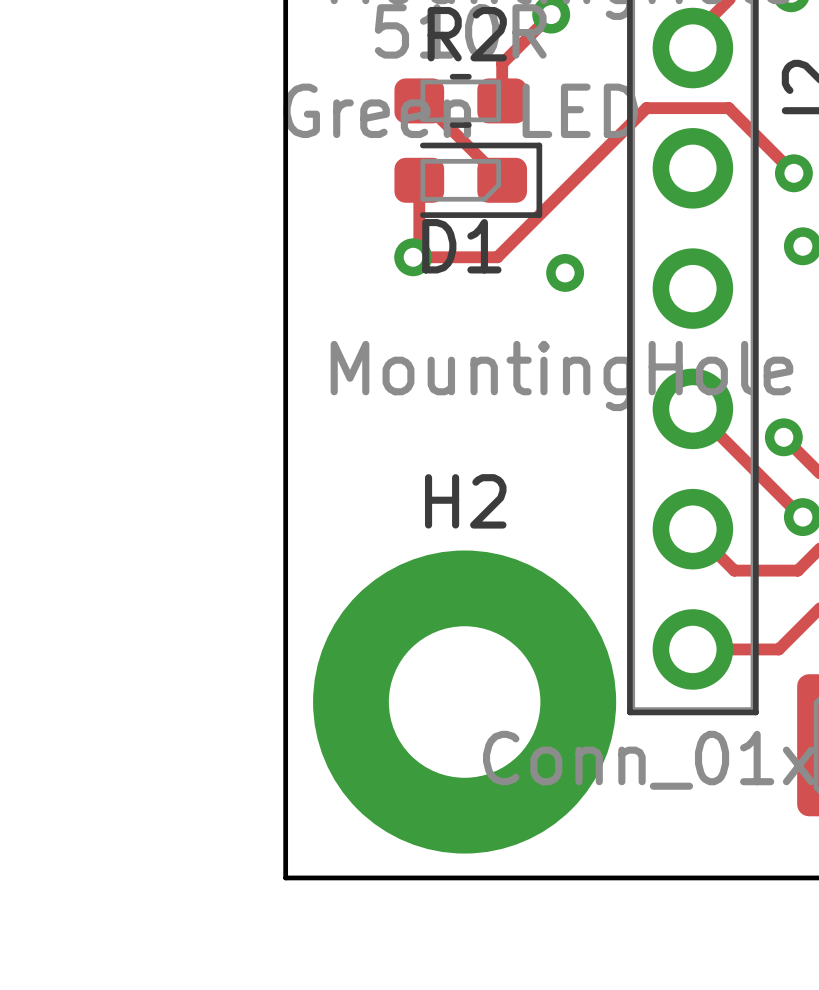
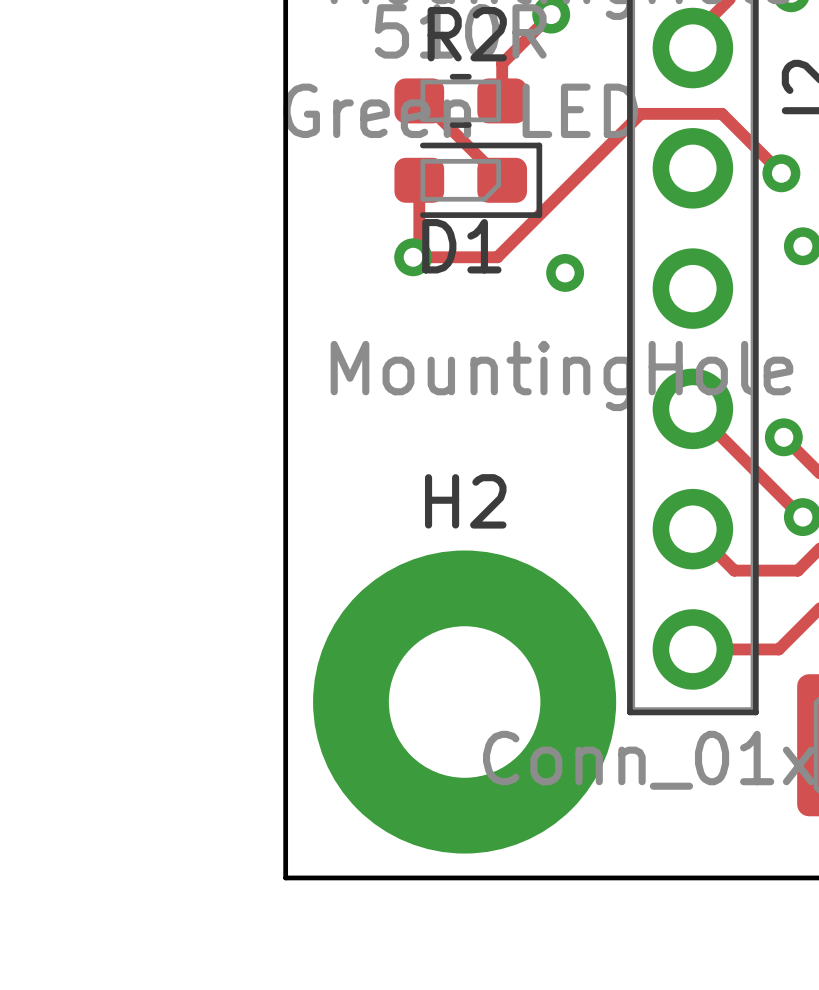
track: (640, 113) (646, 108) (728, 108) (793, 173) -> (640, 113) (722, 113) (781, 173)
via position: (793, 173) -> (781, 173)

